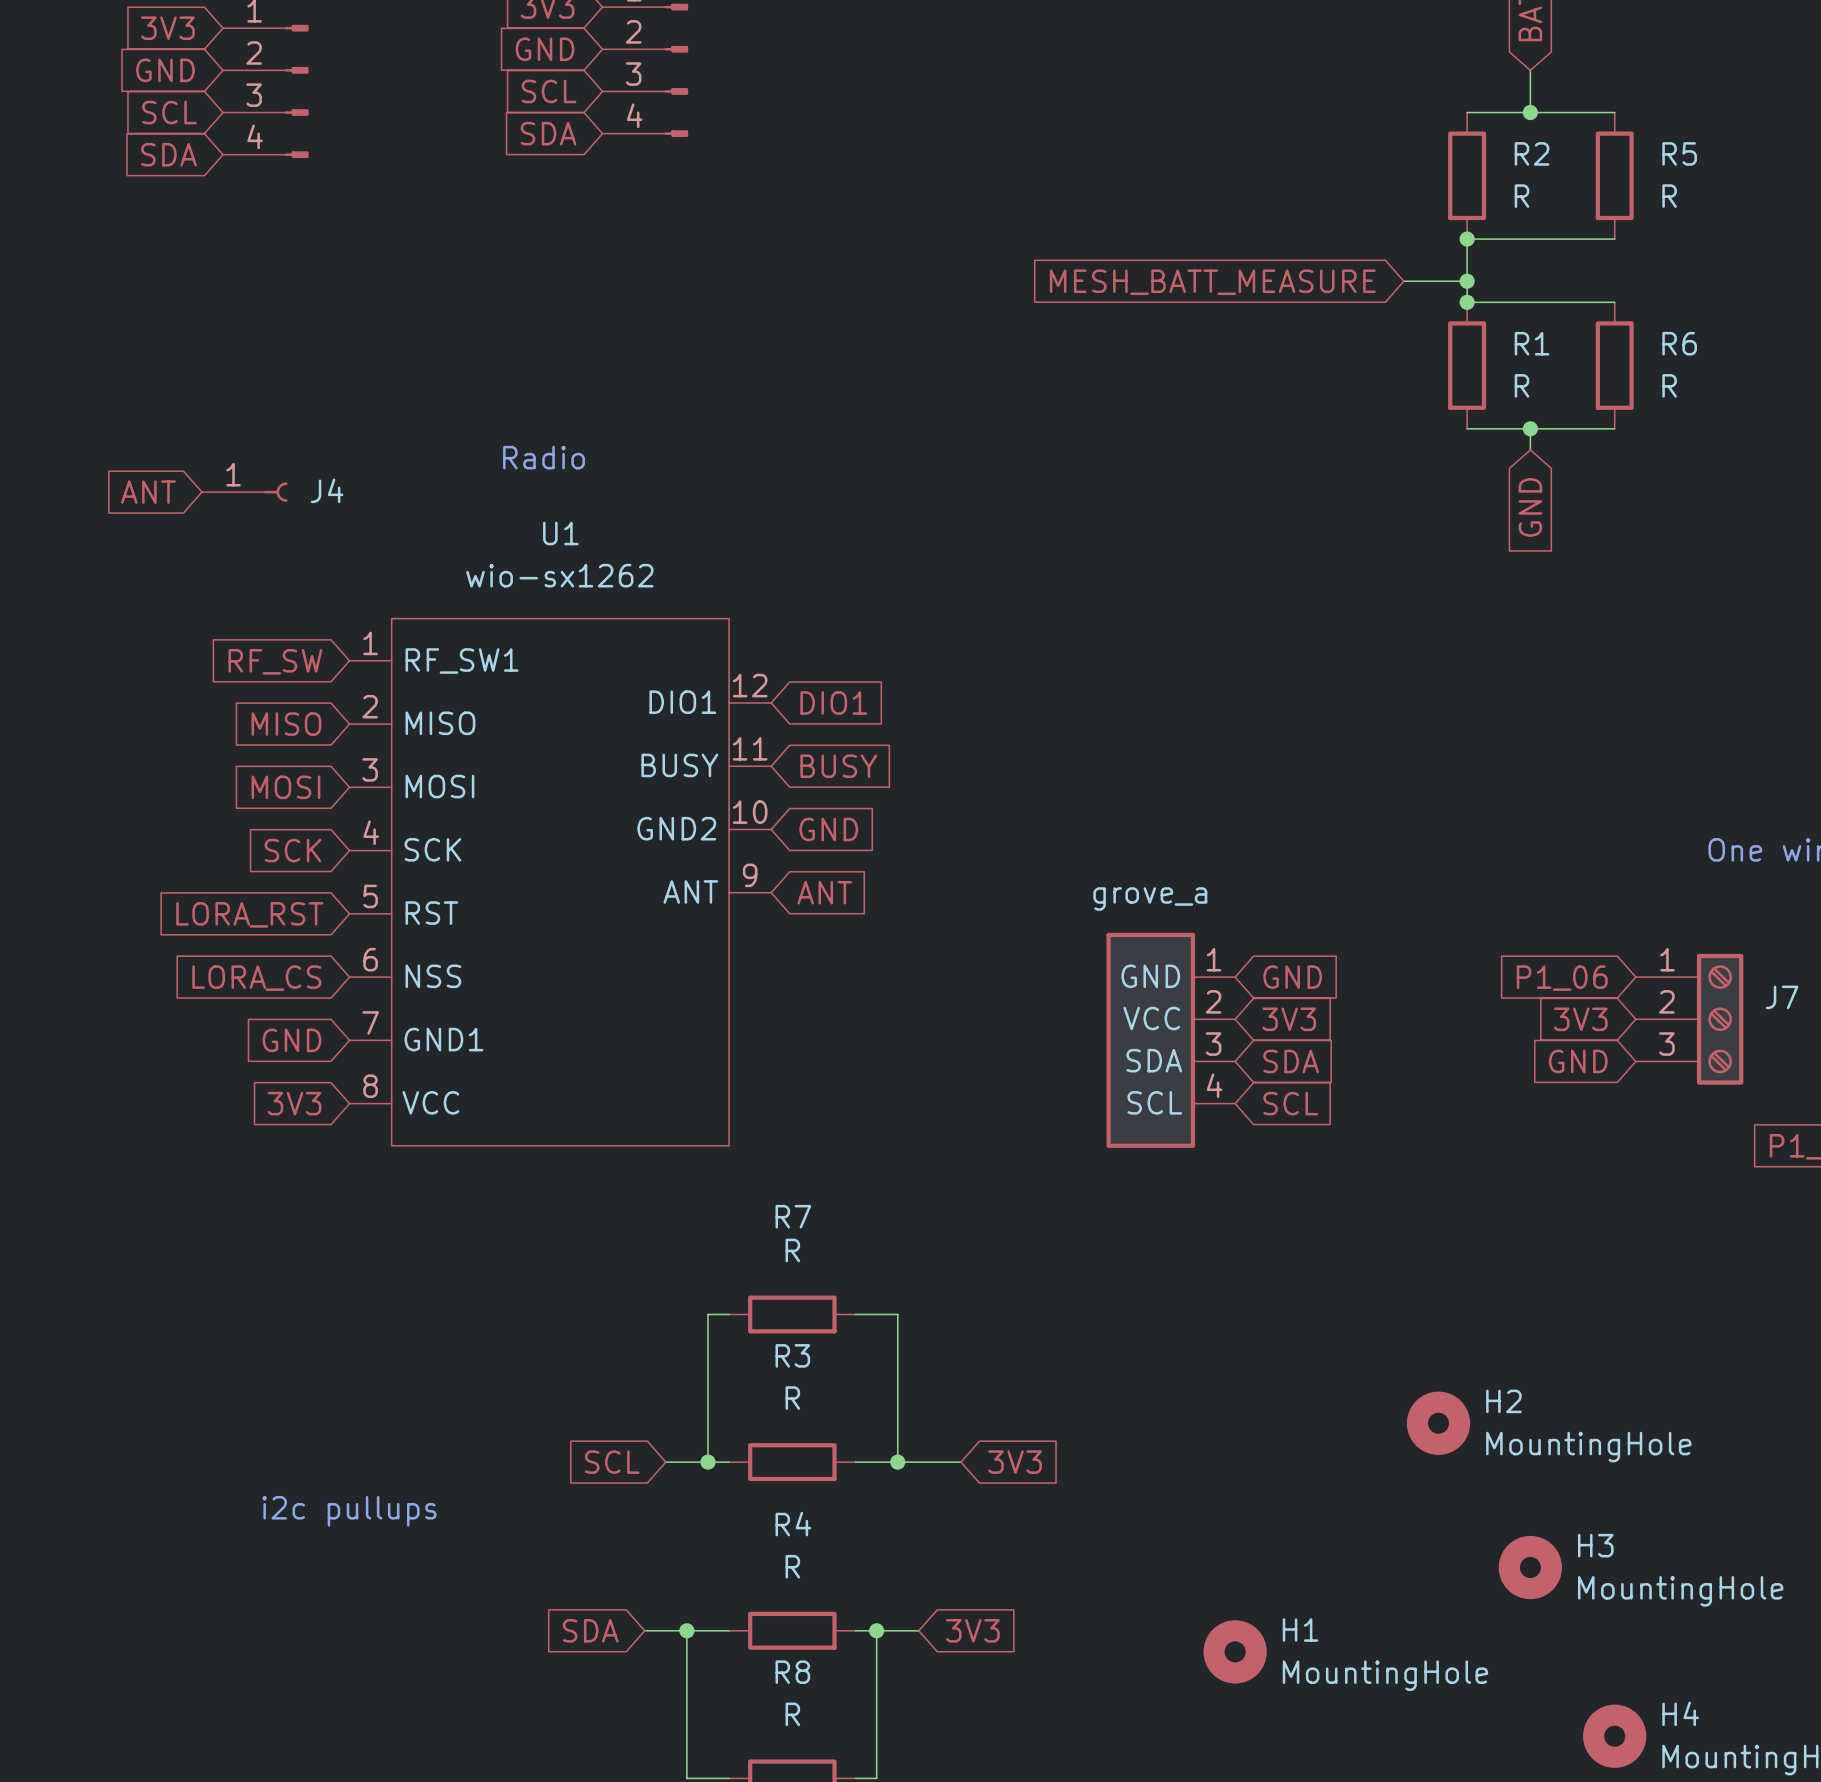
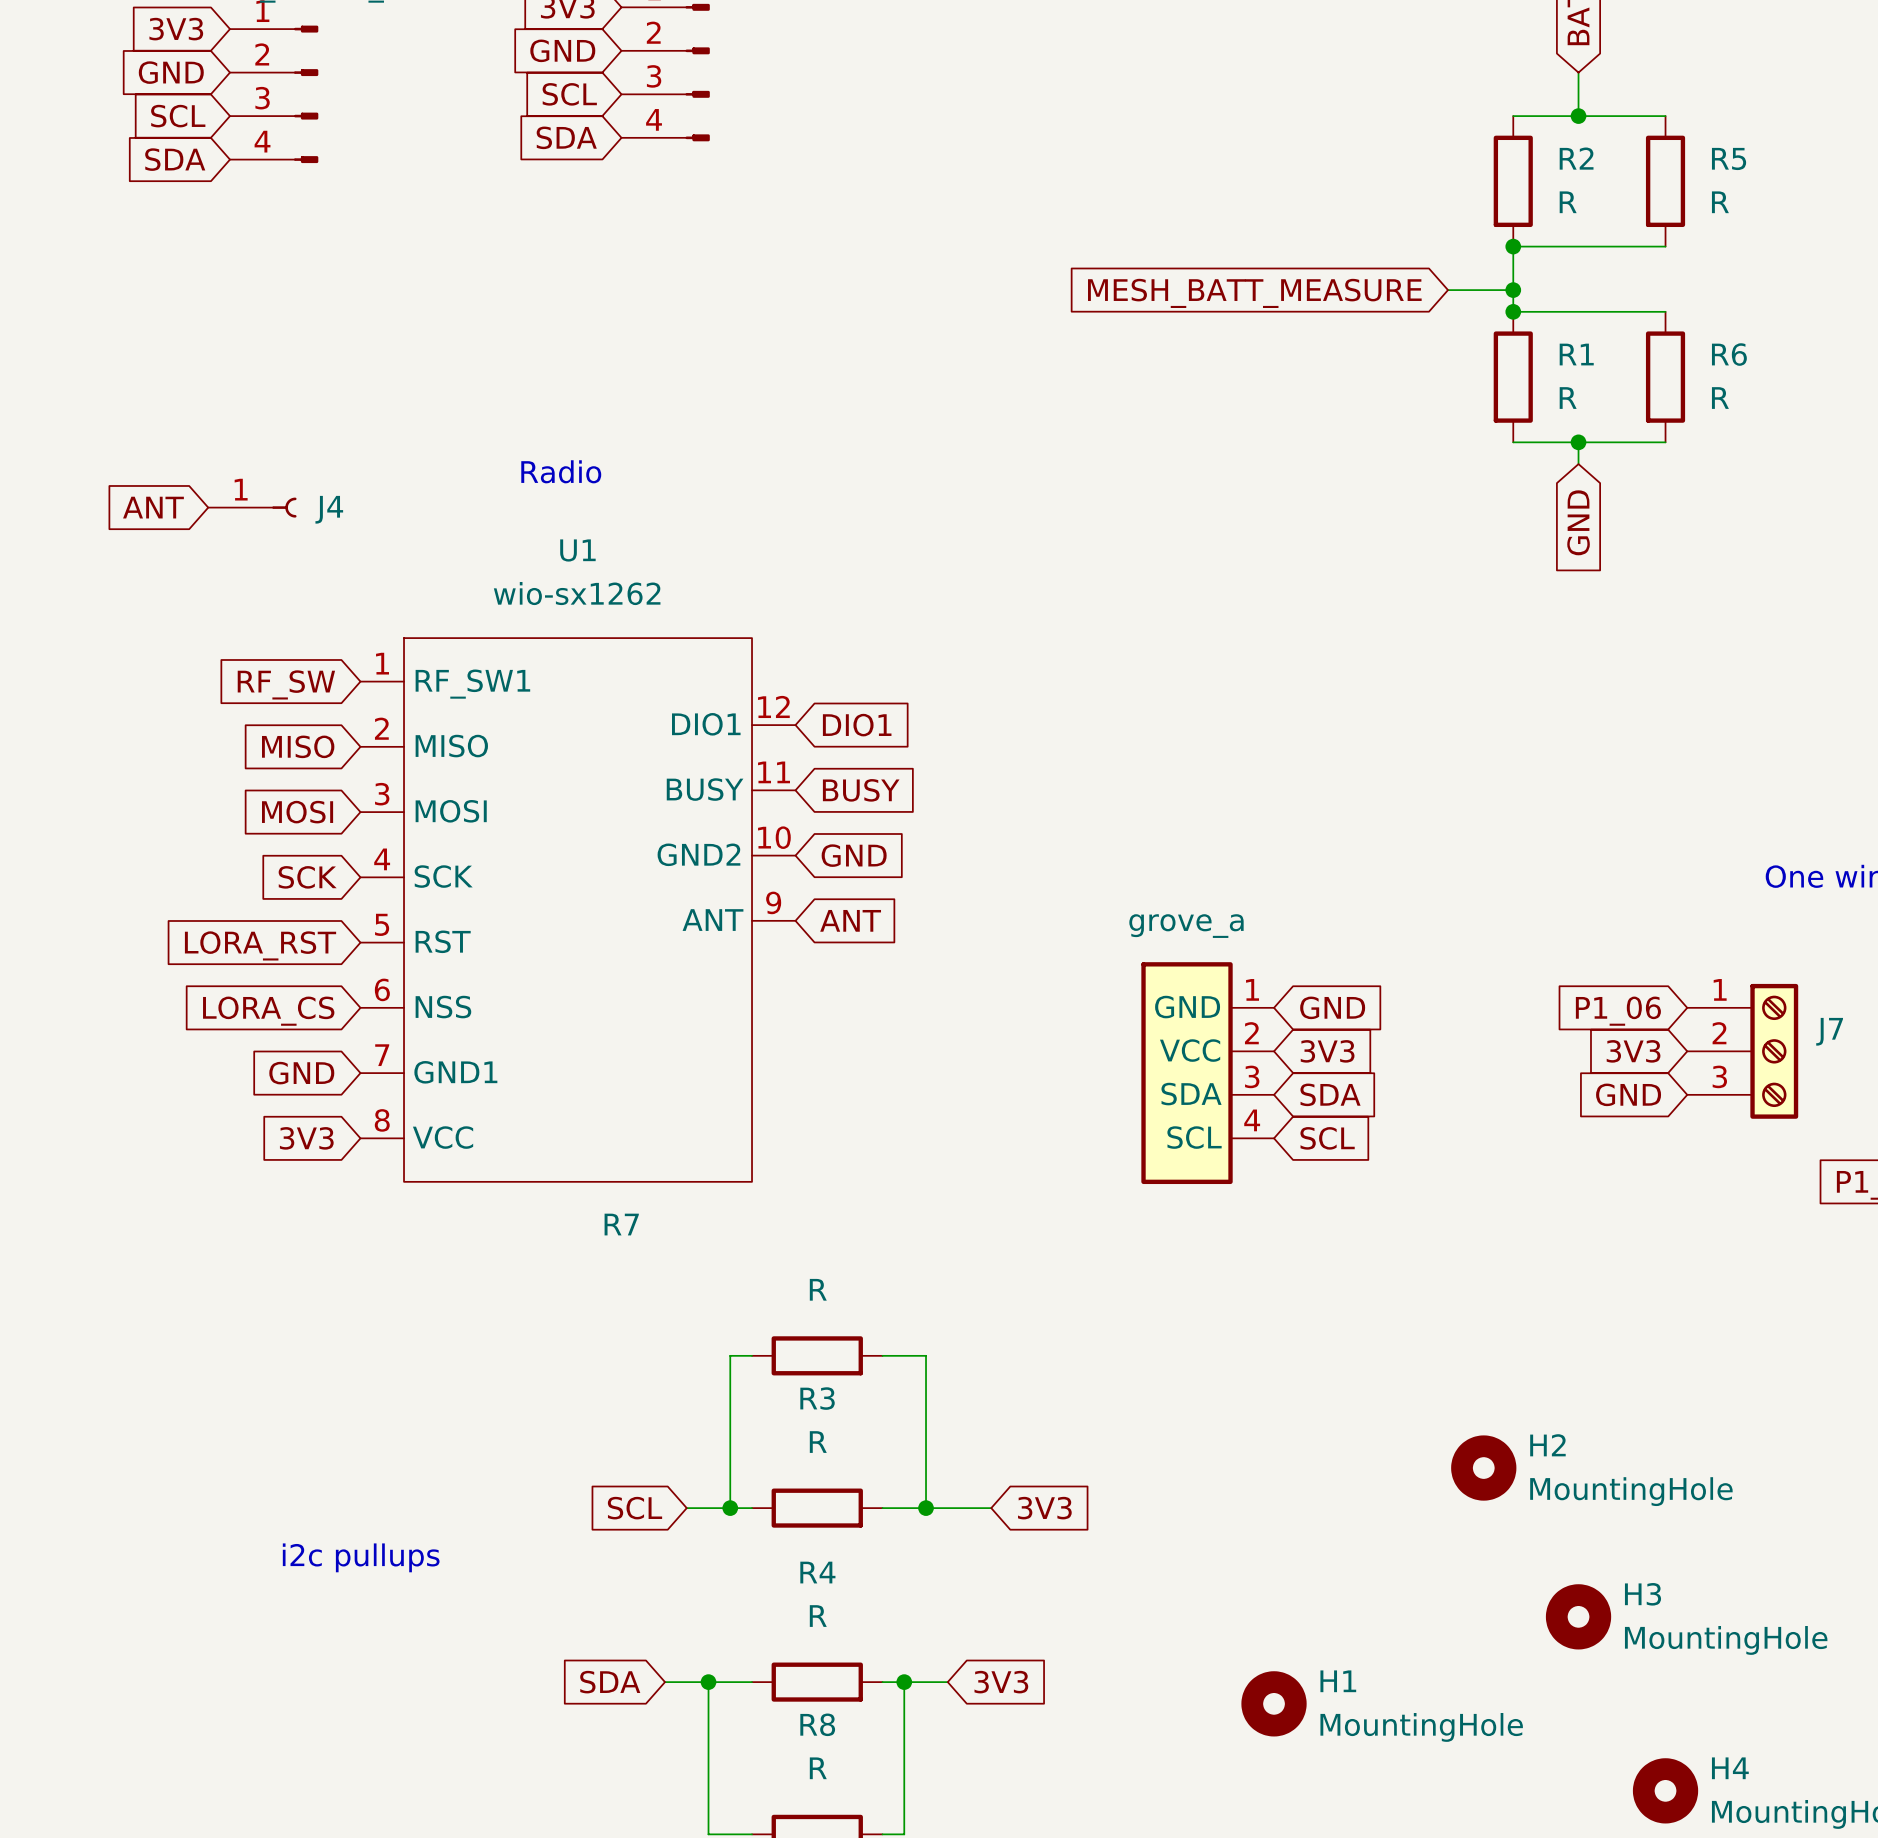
R7 name position: R7 (793, 1216) -> R7 (621, 1224)

